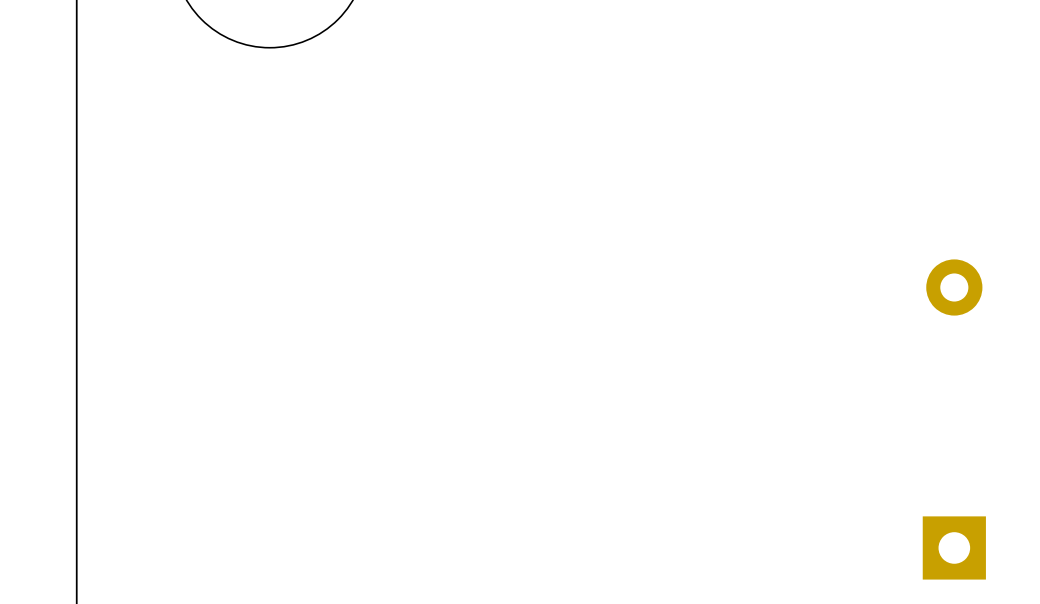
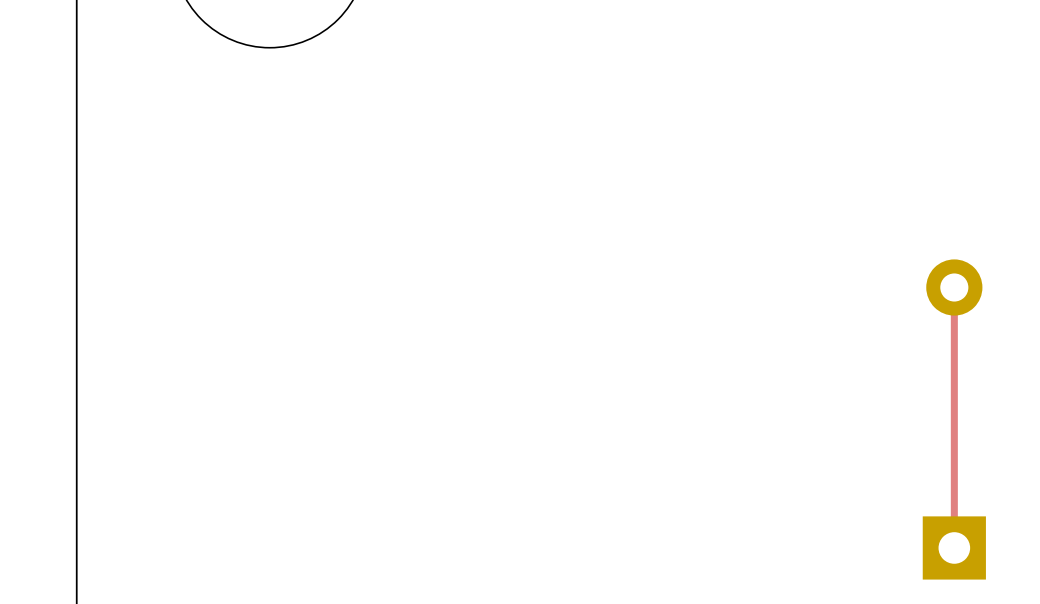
top track: none -> (954, 287) (954, 547)

